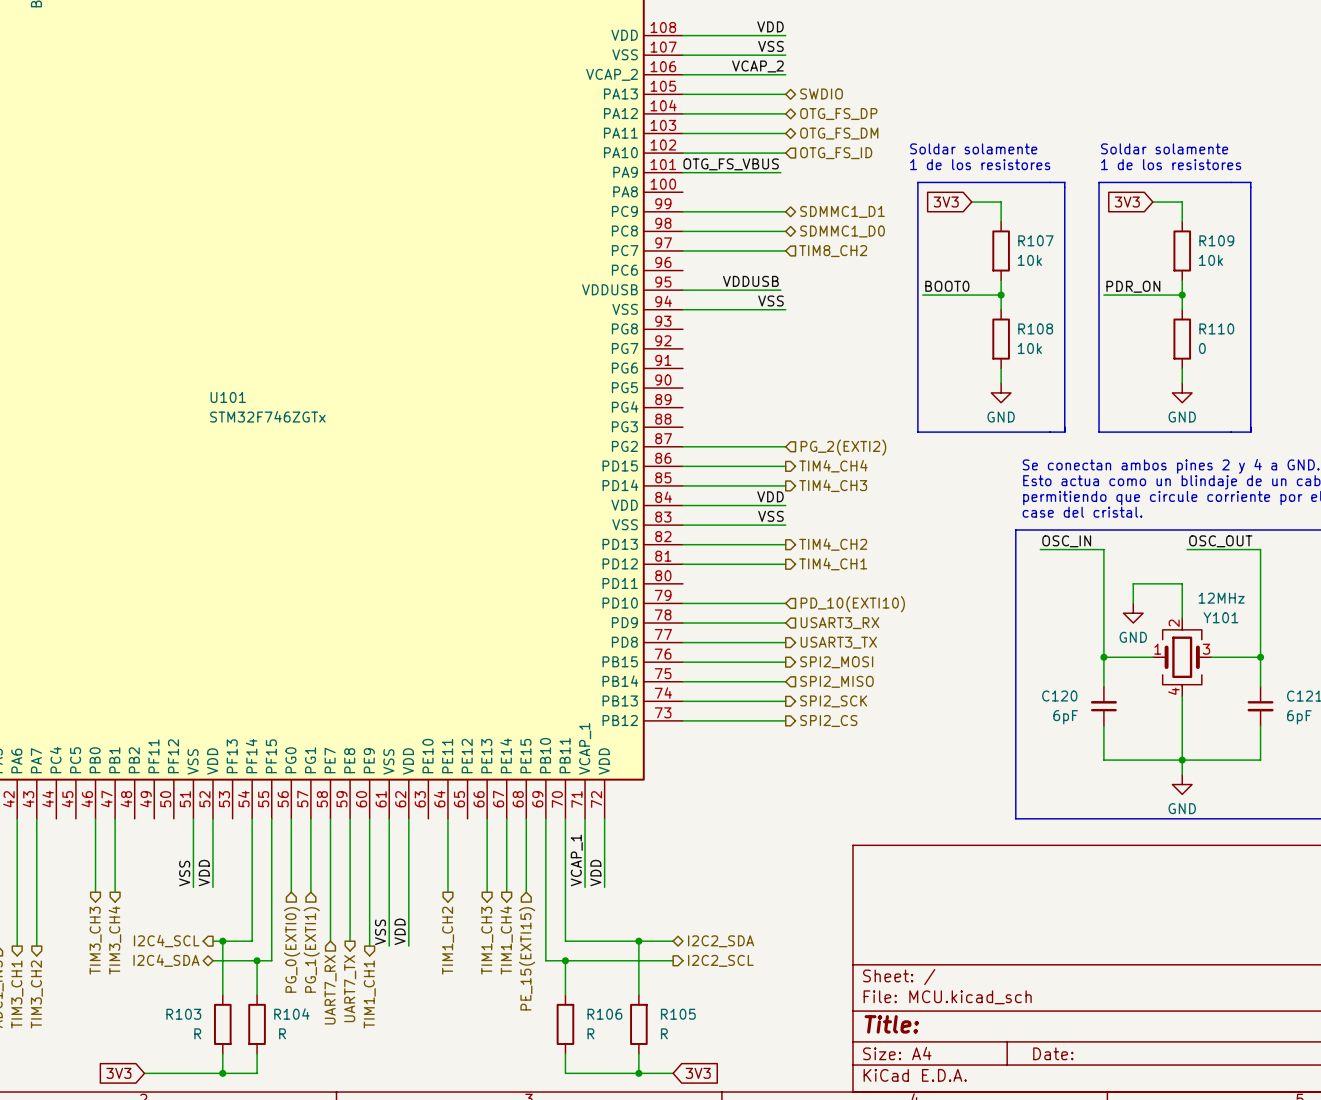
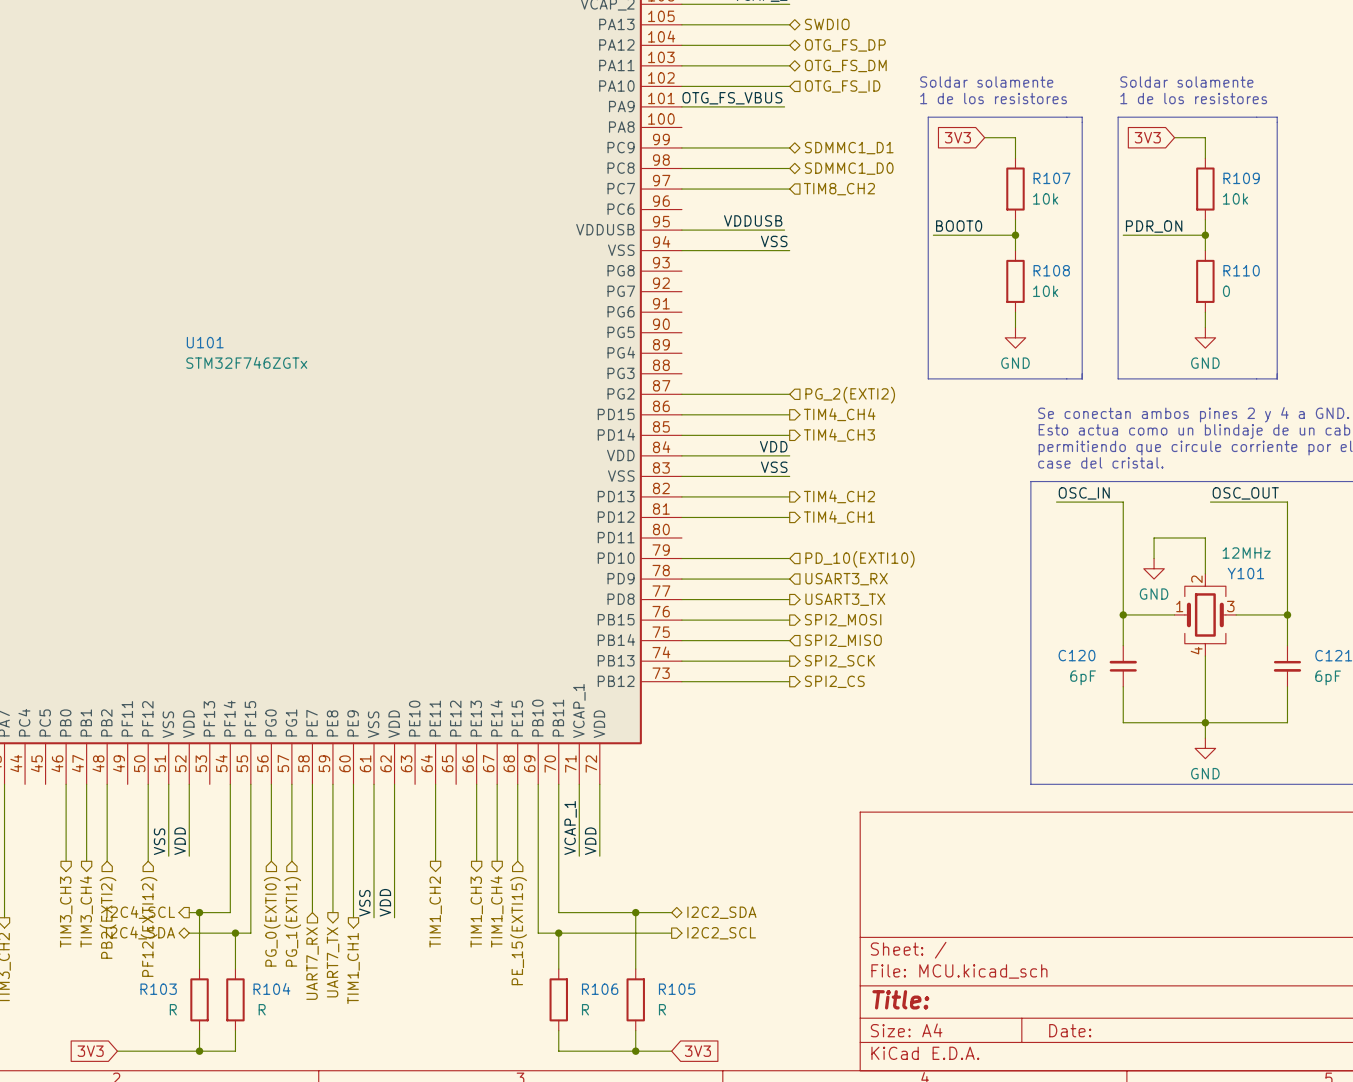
wire: none -> (107, 784) (107, 861)
wire: none -> (148, 784) (148, 861)
hierarchical label: none -> PB2(EXTI2) (107, 917)
hierarchical label: none -> PF12(EXTI12) (149, 926)

